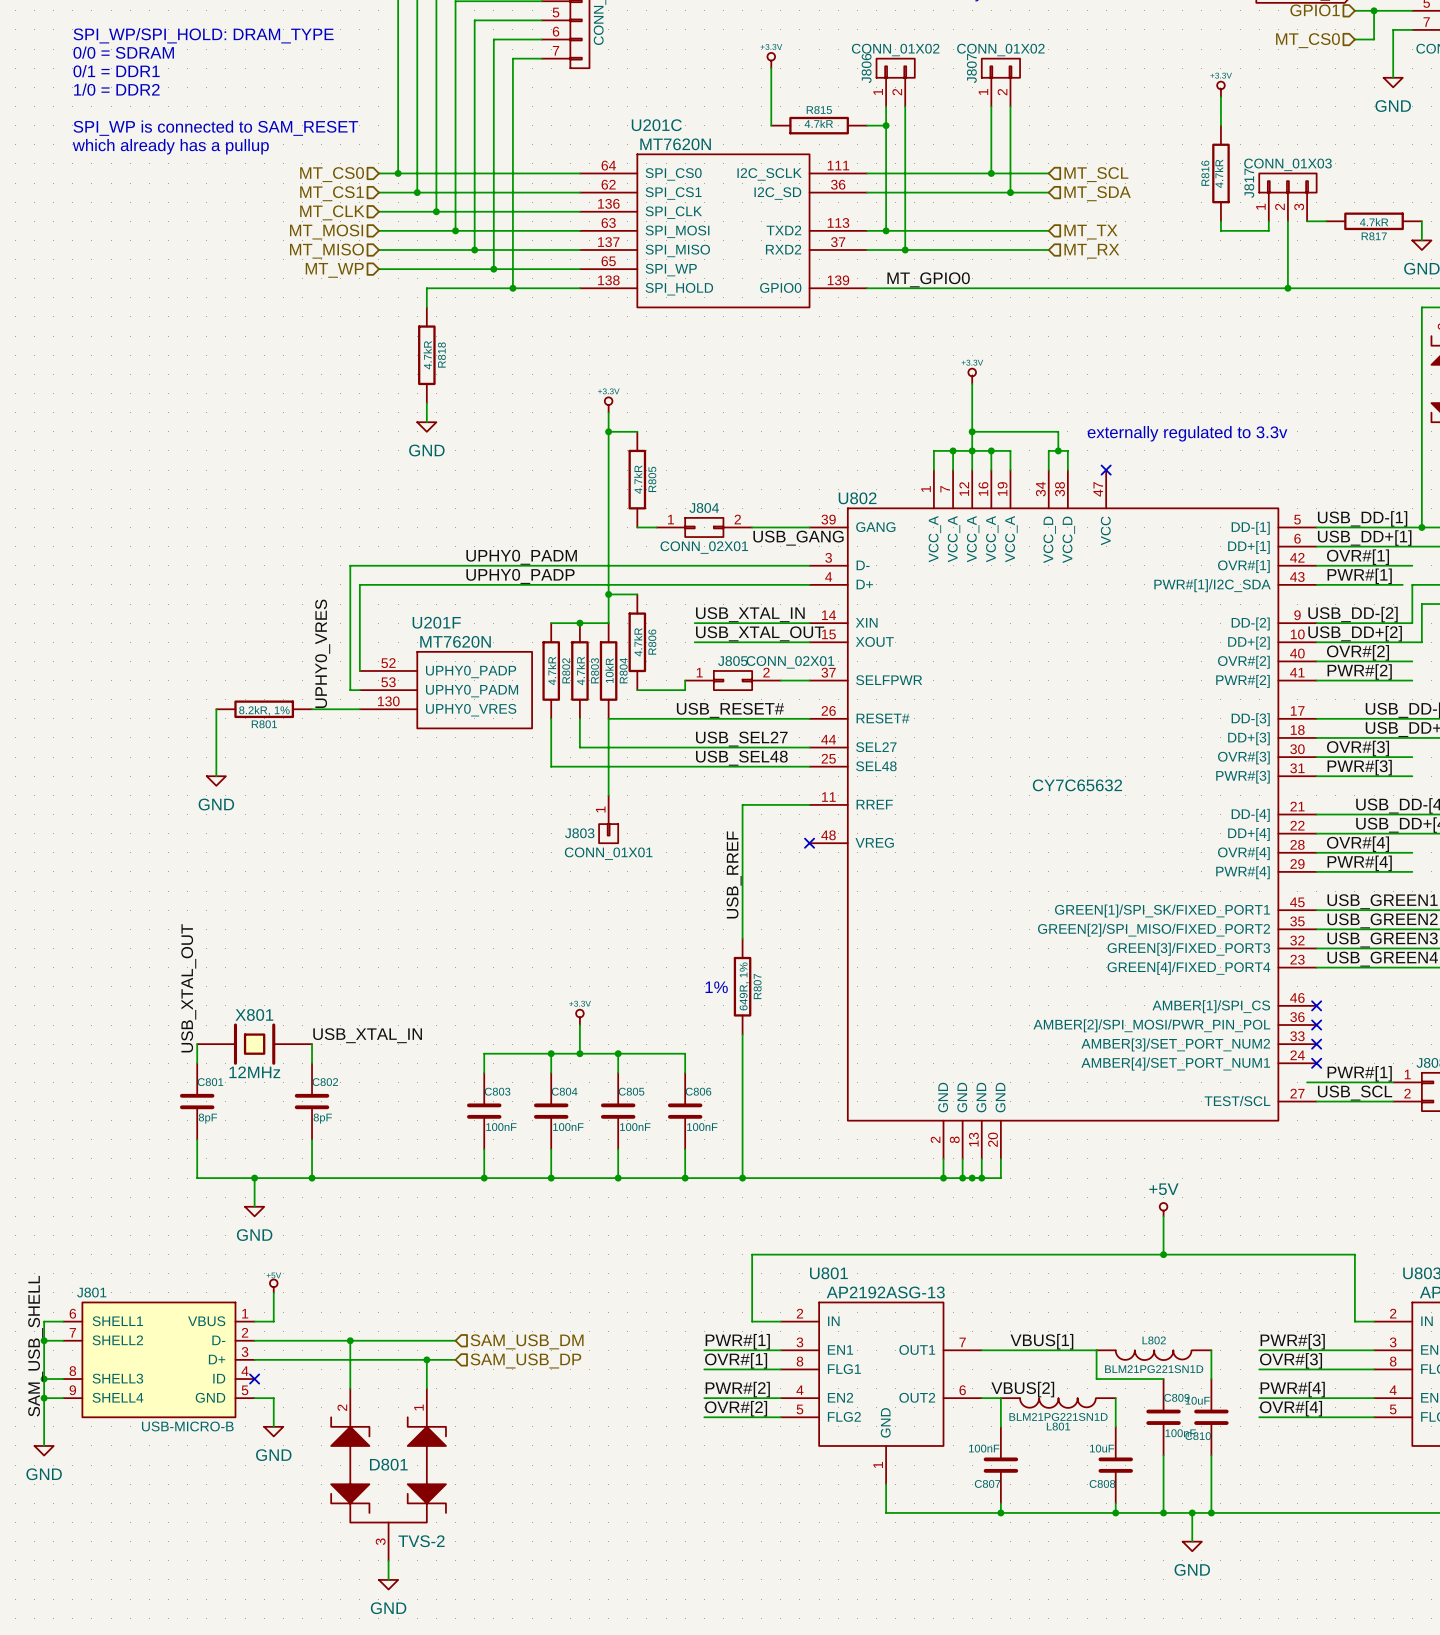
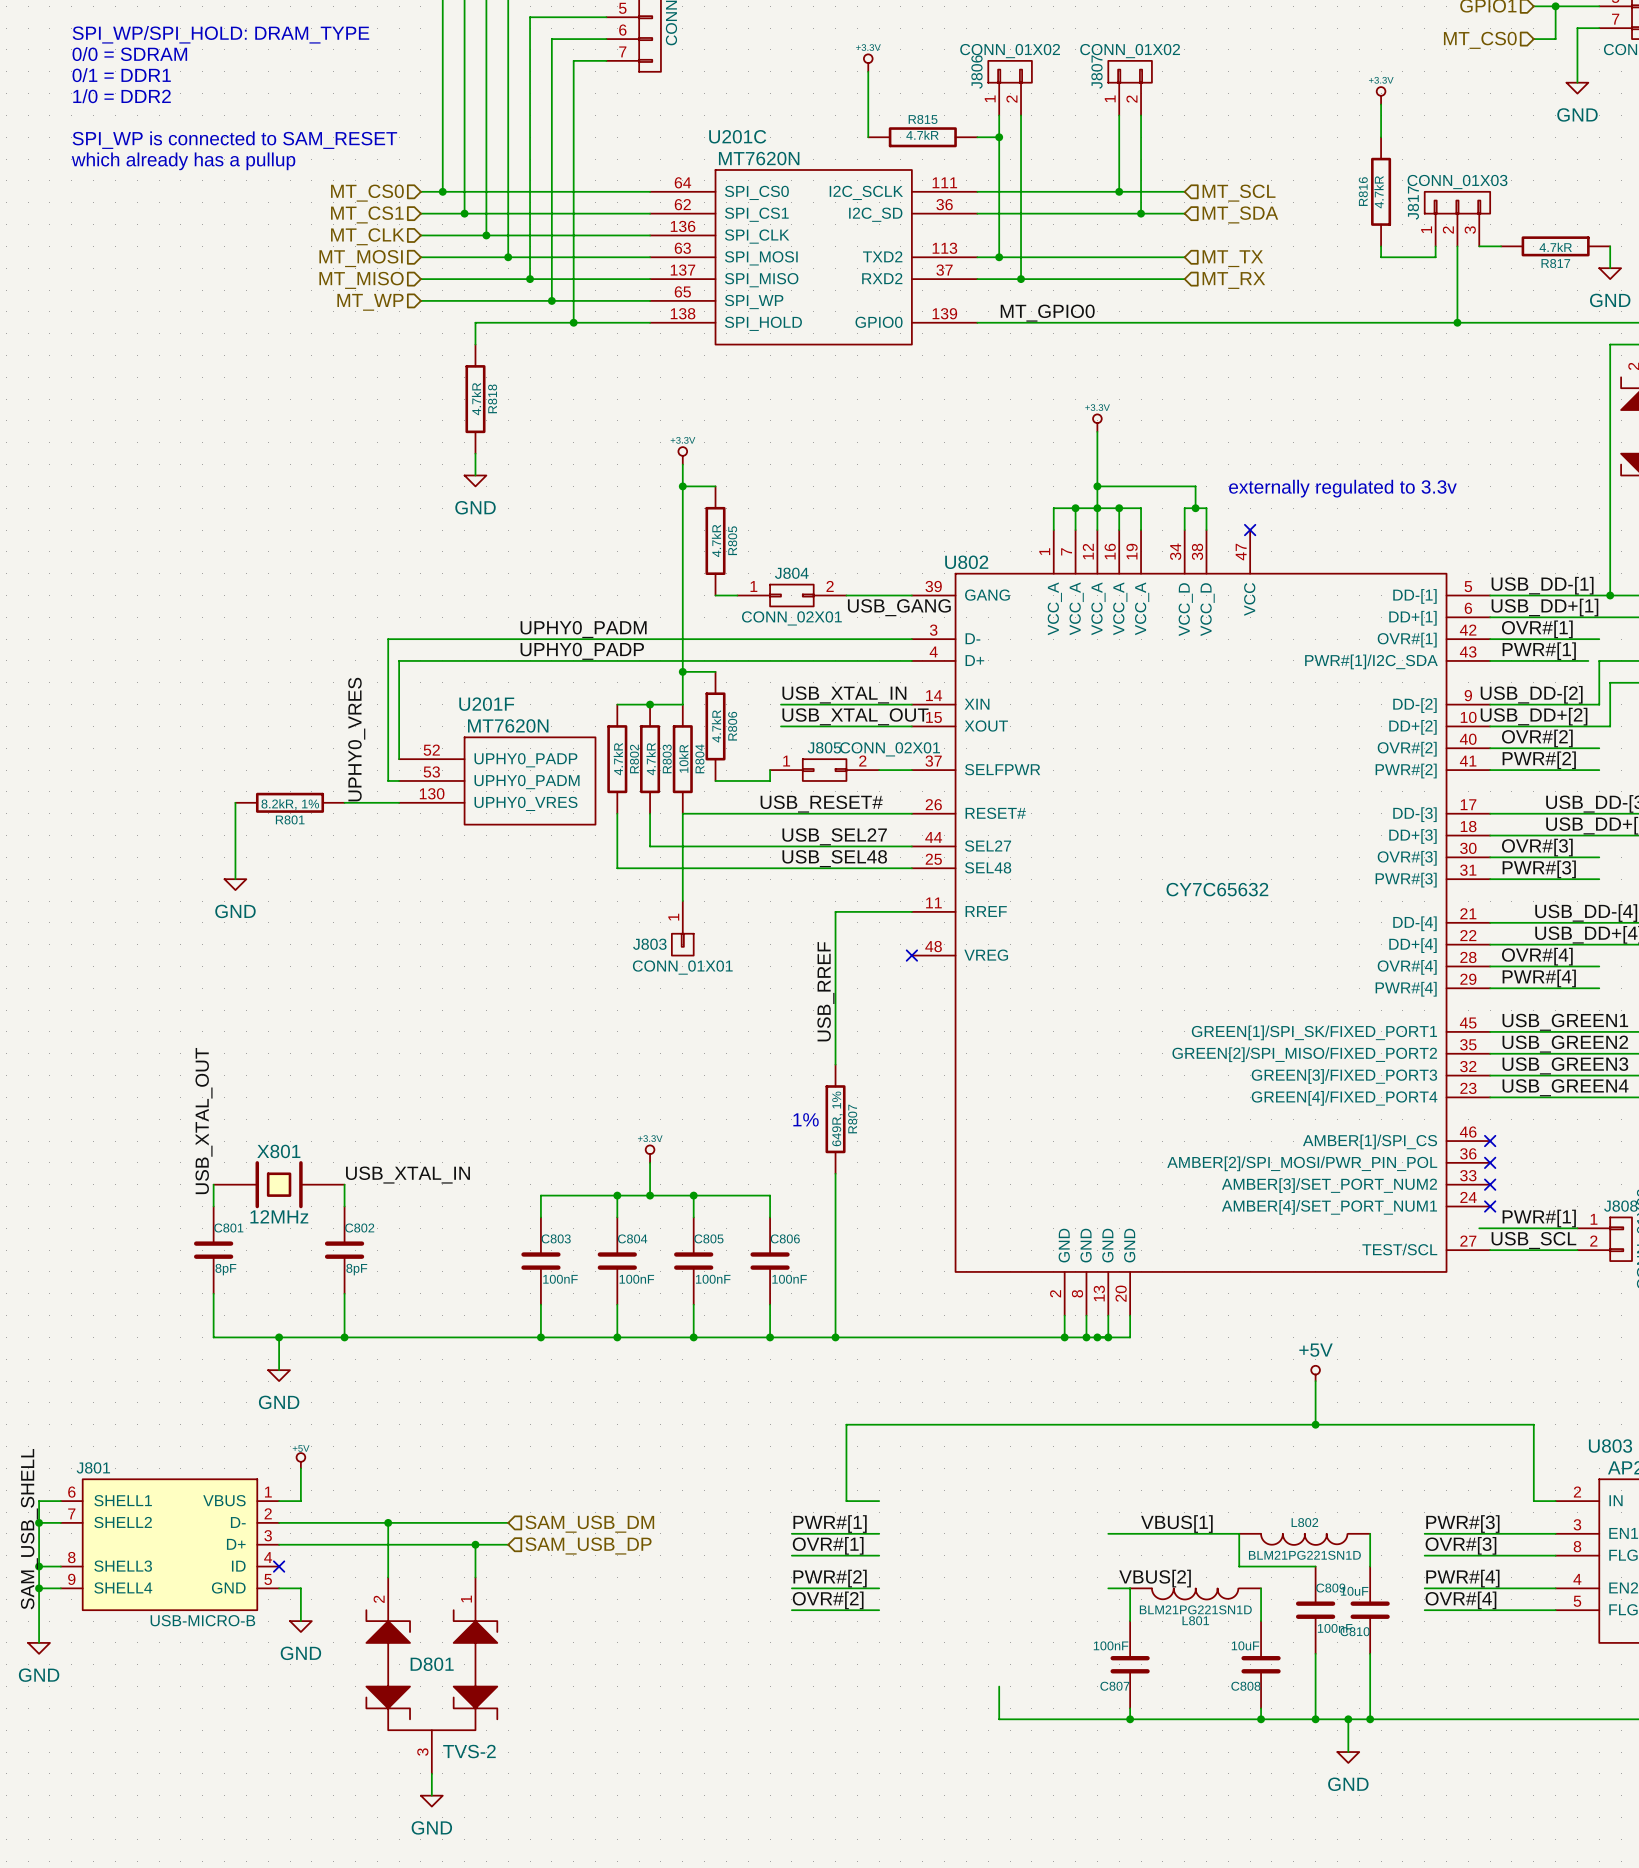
U801: AP2192ASG-13 (881, 1393) -> none

